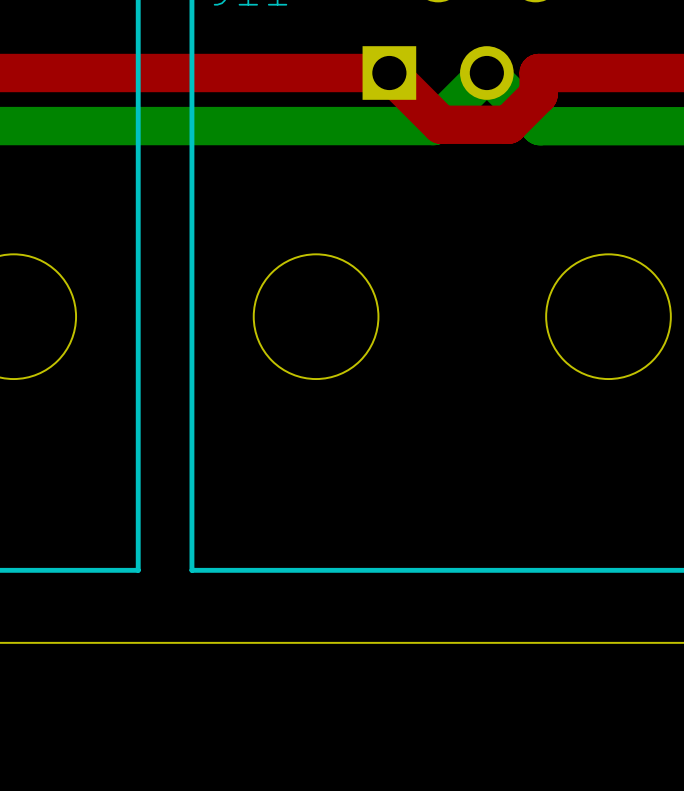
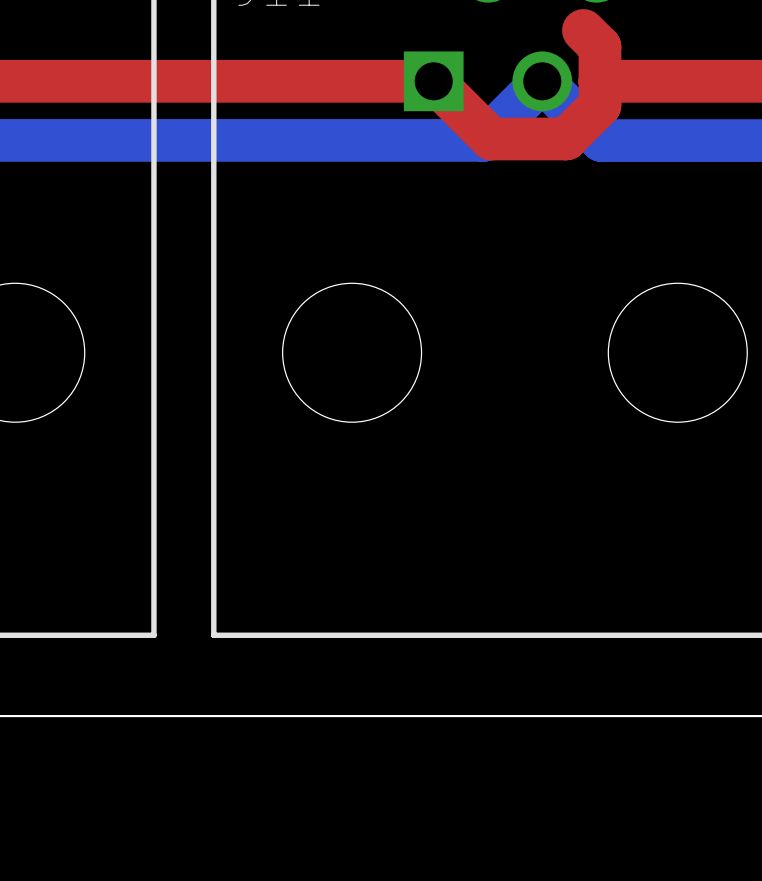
top track: none -> (583, 30) (599, 46) (599, 81)

